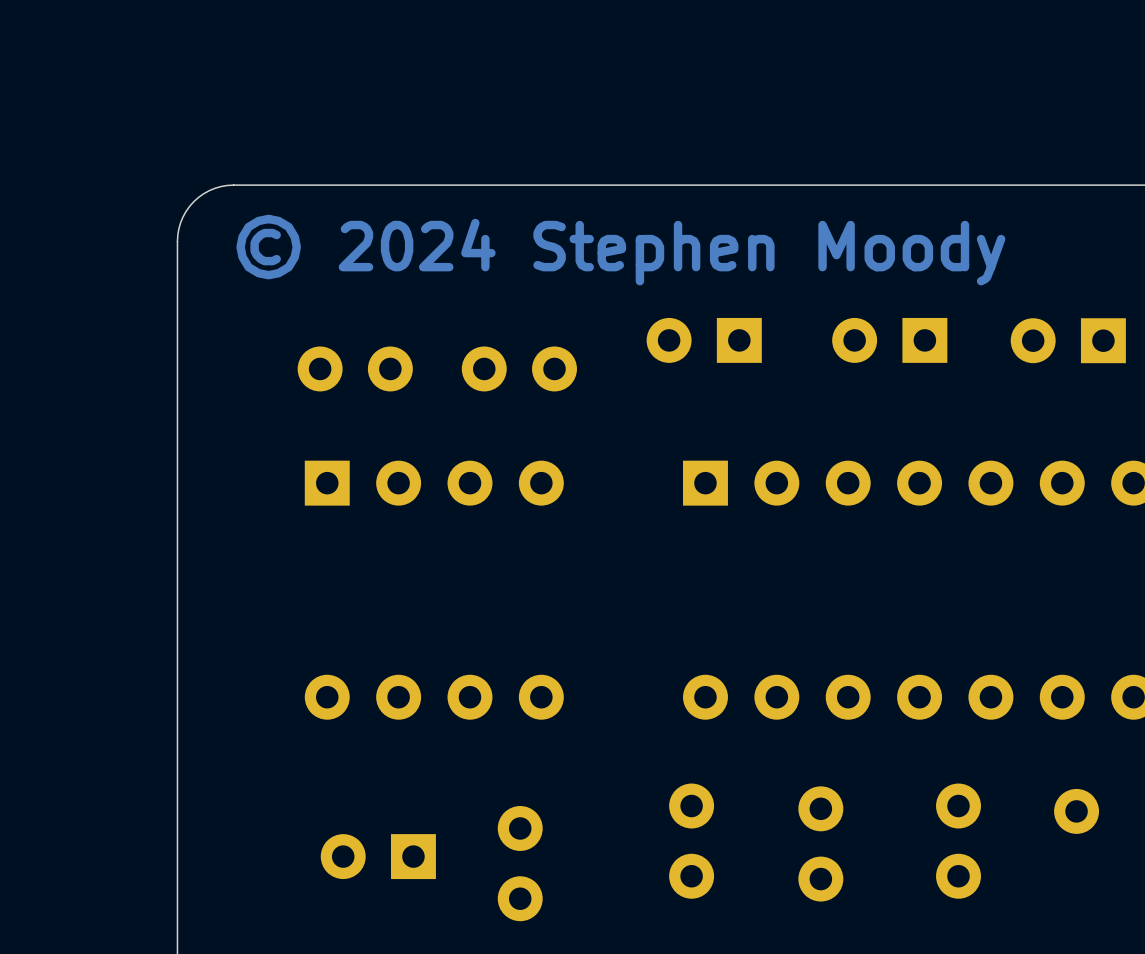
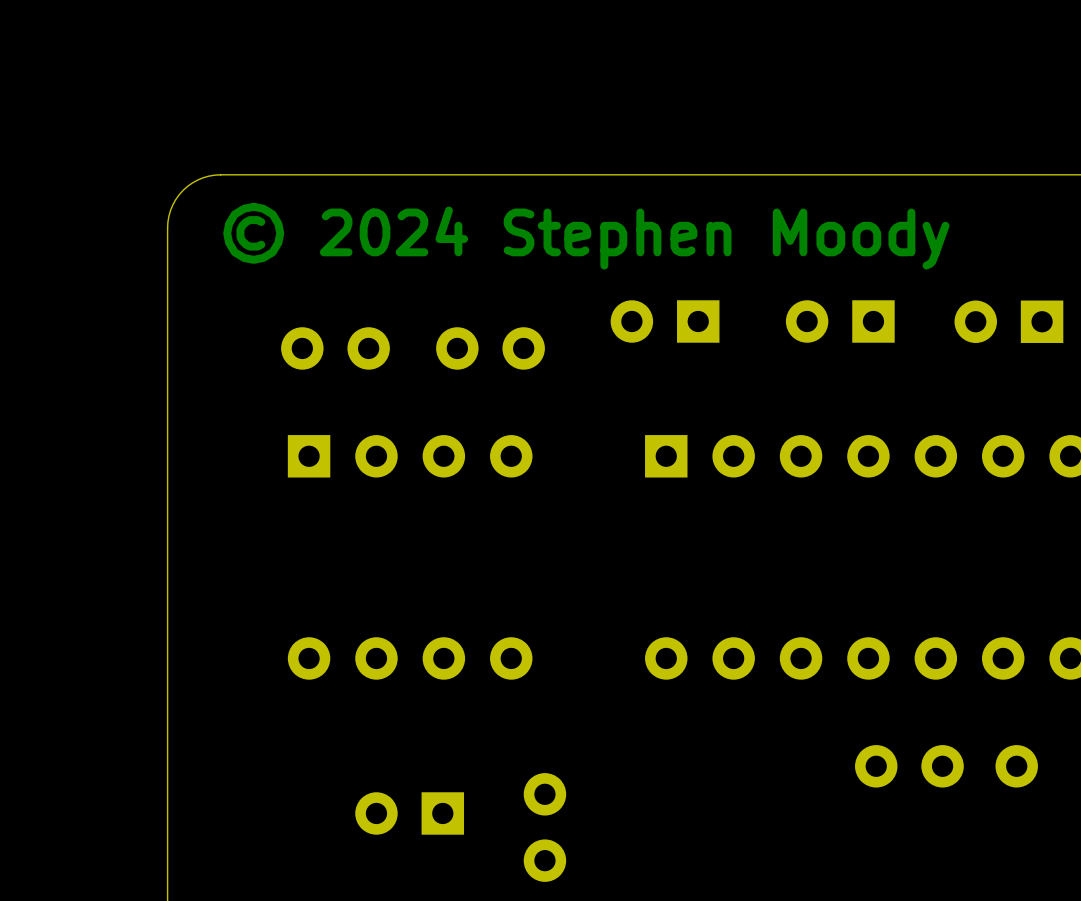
part: (691, 841) -> none
part rotation: 0° (958, 841) -> 90° clockwise (909, 766)
part: (820, 843) -> none
part position: (378, 856) -> (409, 813)
part position: (520, 863) -> (544, 827)

